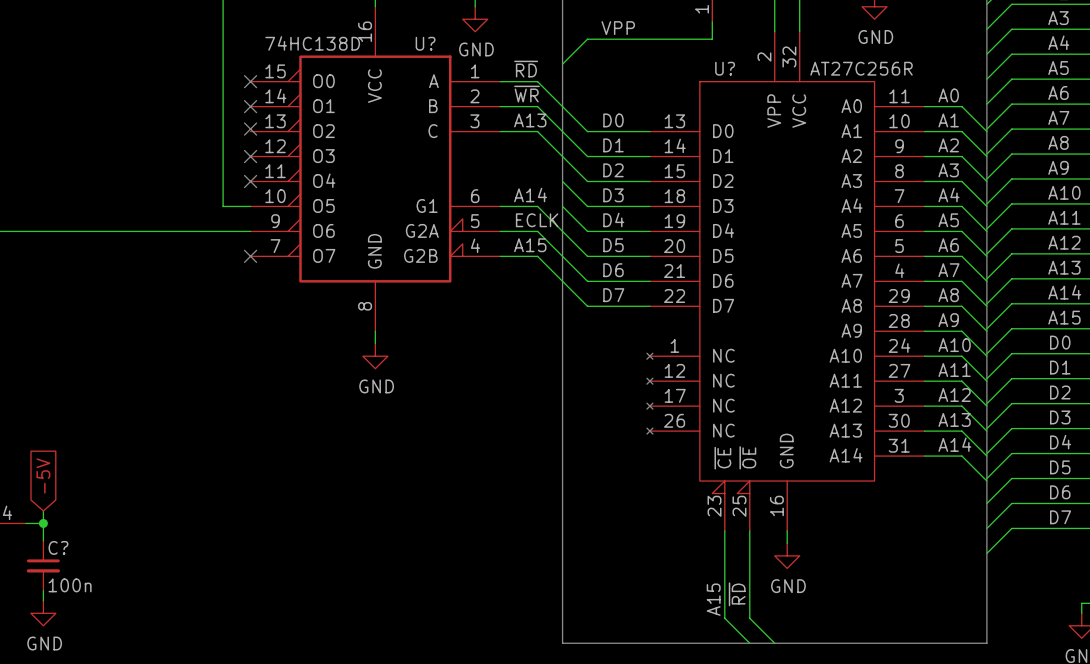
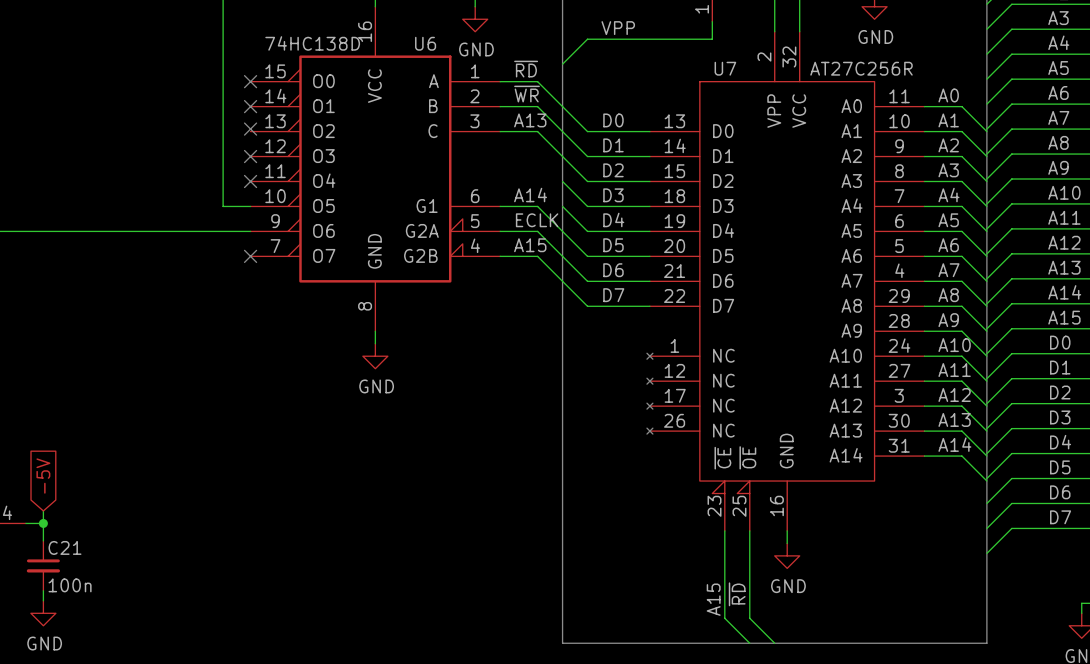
U? name: U? (425, 43) -> U6 (425, 43)
U? name: U? (725, 68) -> U7 (725, 68)
C? name: C? (58, 547) -> C21 (65, 547)

